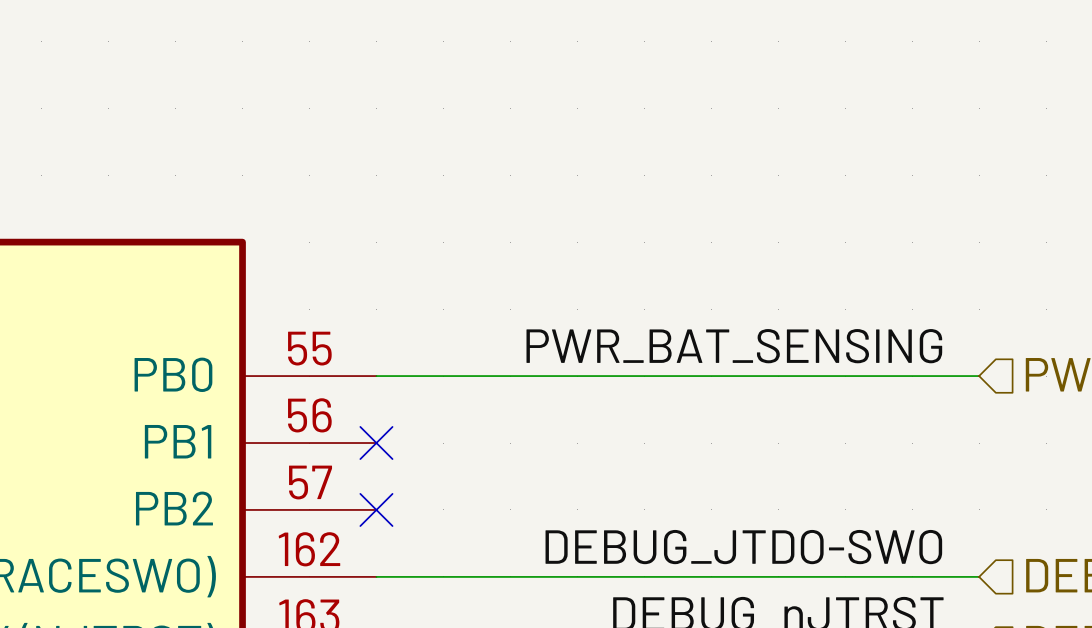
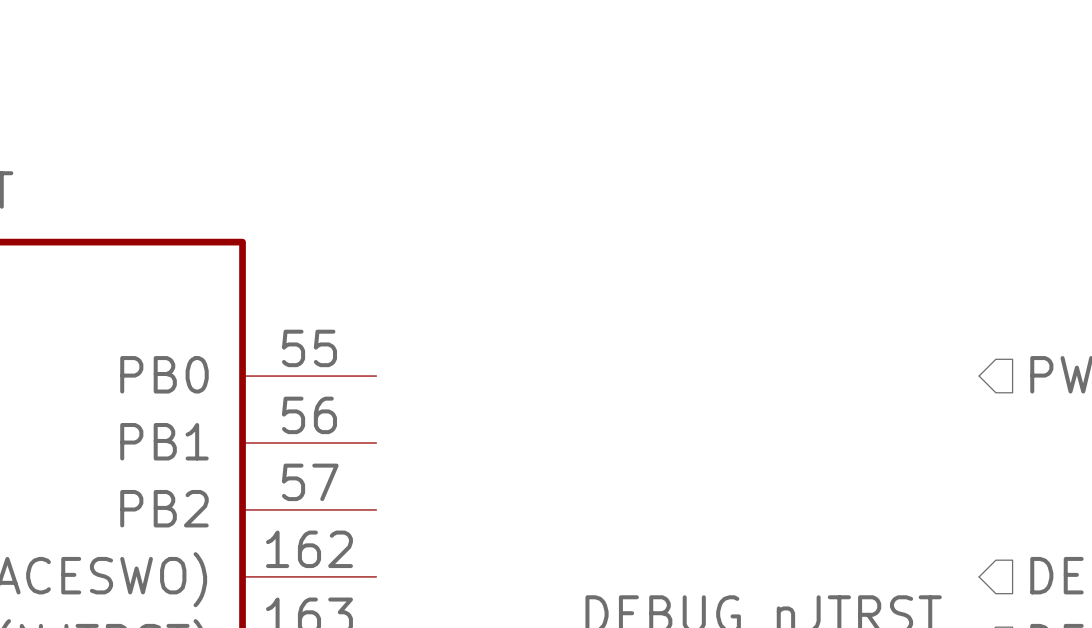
label: PWR_BAT_SENSING (734, 346) -> none
wire: (376, 376) (979, 376) -> none
no-connect mark: (376, 443) -> none
no-connect mark: (376, 509) -> none
label: DEBUG_JTDO-SWO (743, 547) -> none
wire: (376, 576) (979, 576) -> none

